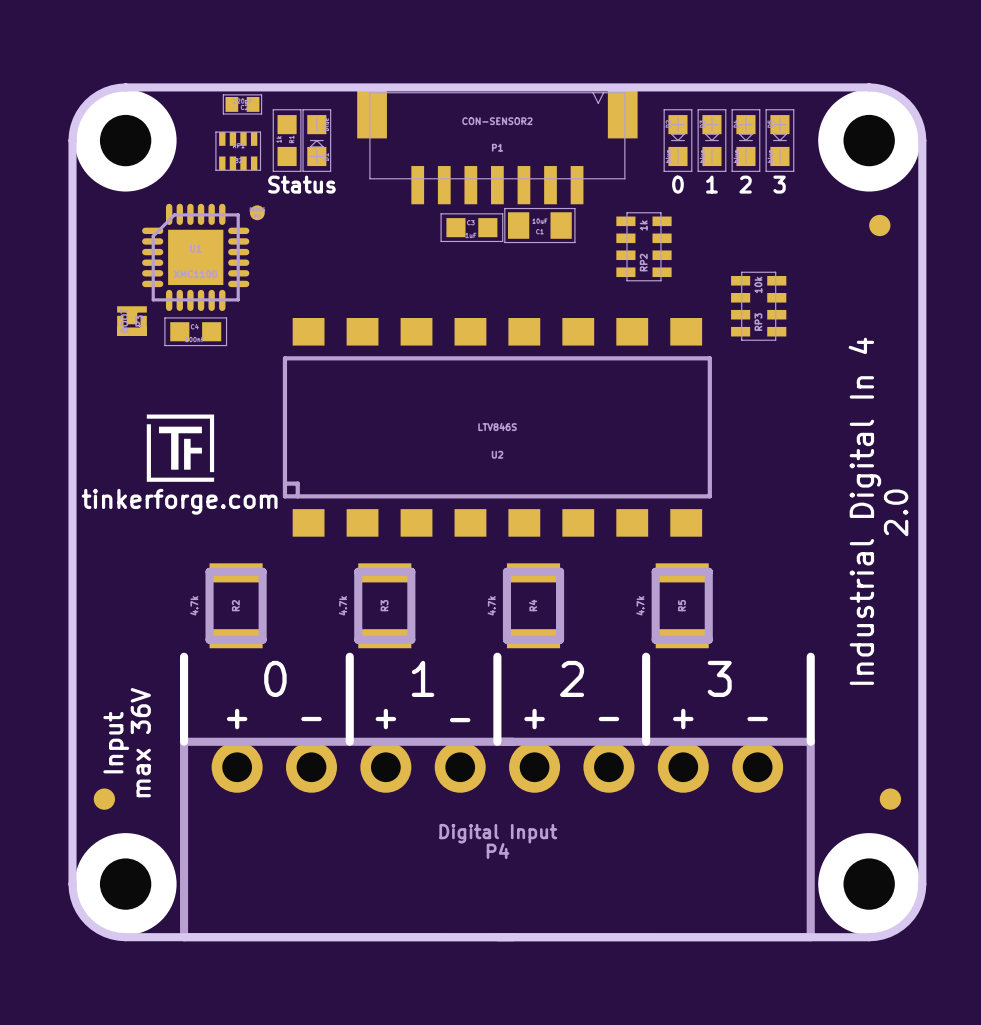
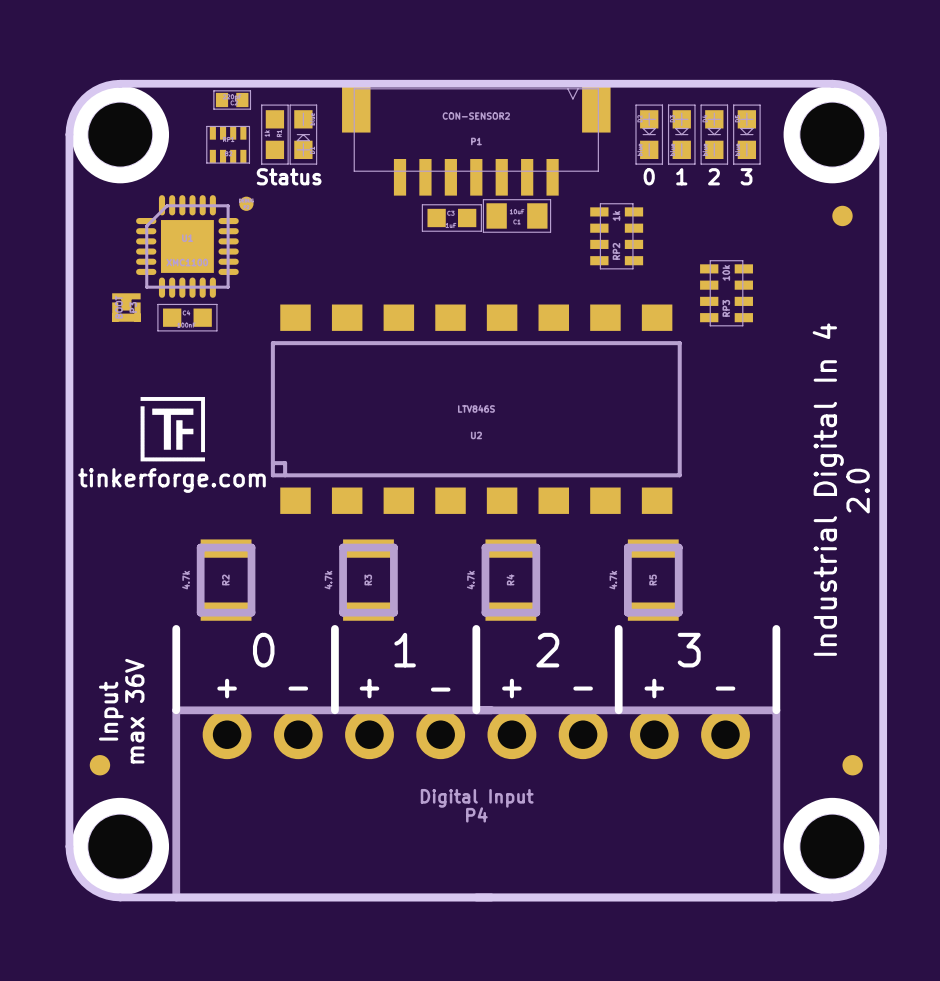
part footprint: [74, 89, 177, 192] -> [71, 85, 170, 184]
part footprint: [818, 89, 921, 192] -> [783, 85, 882, 184]
part footprint: [74, 833, 177, 936] -> [71, 797, 170, 896]
part footprint: [818, 833, 921, 936] -> [783, 797, 882, 896]

